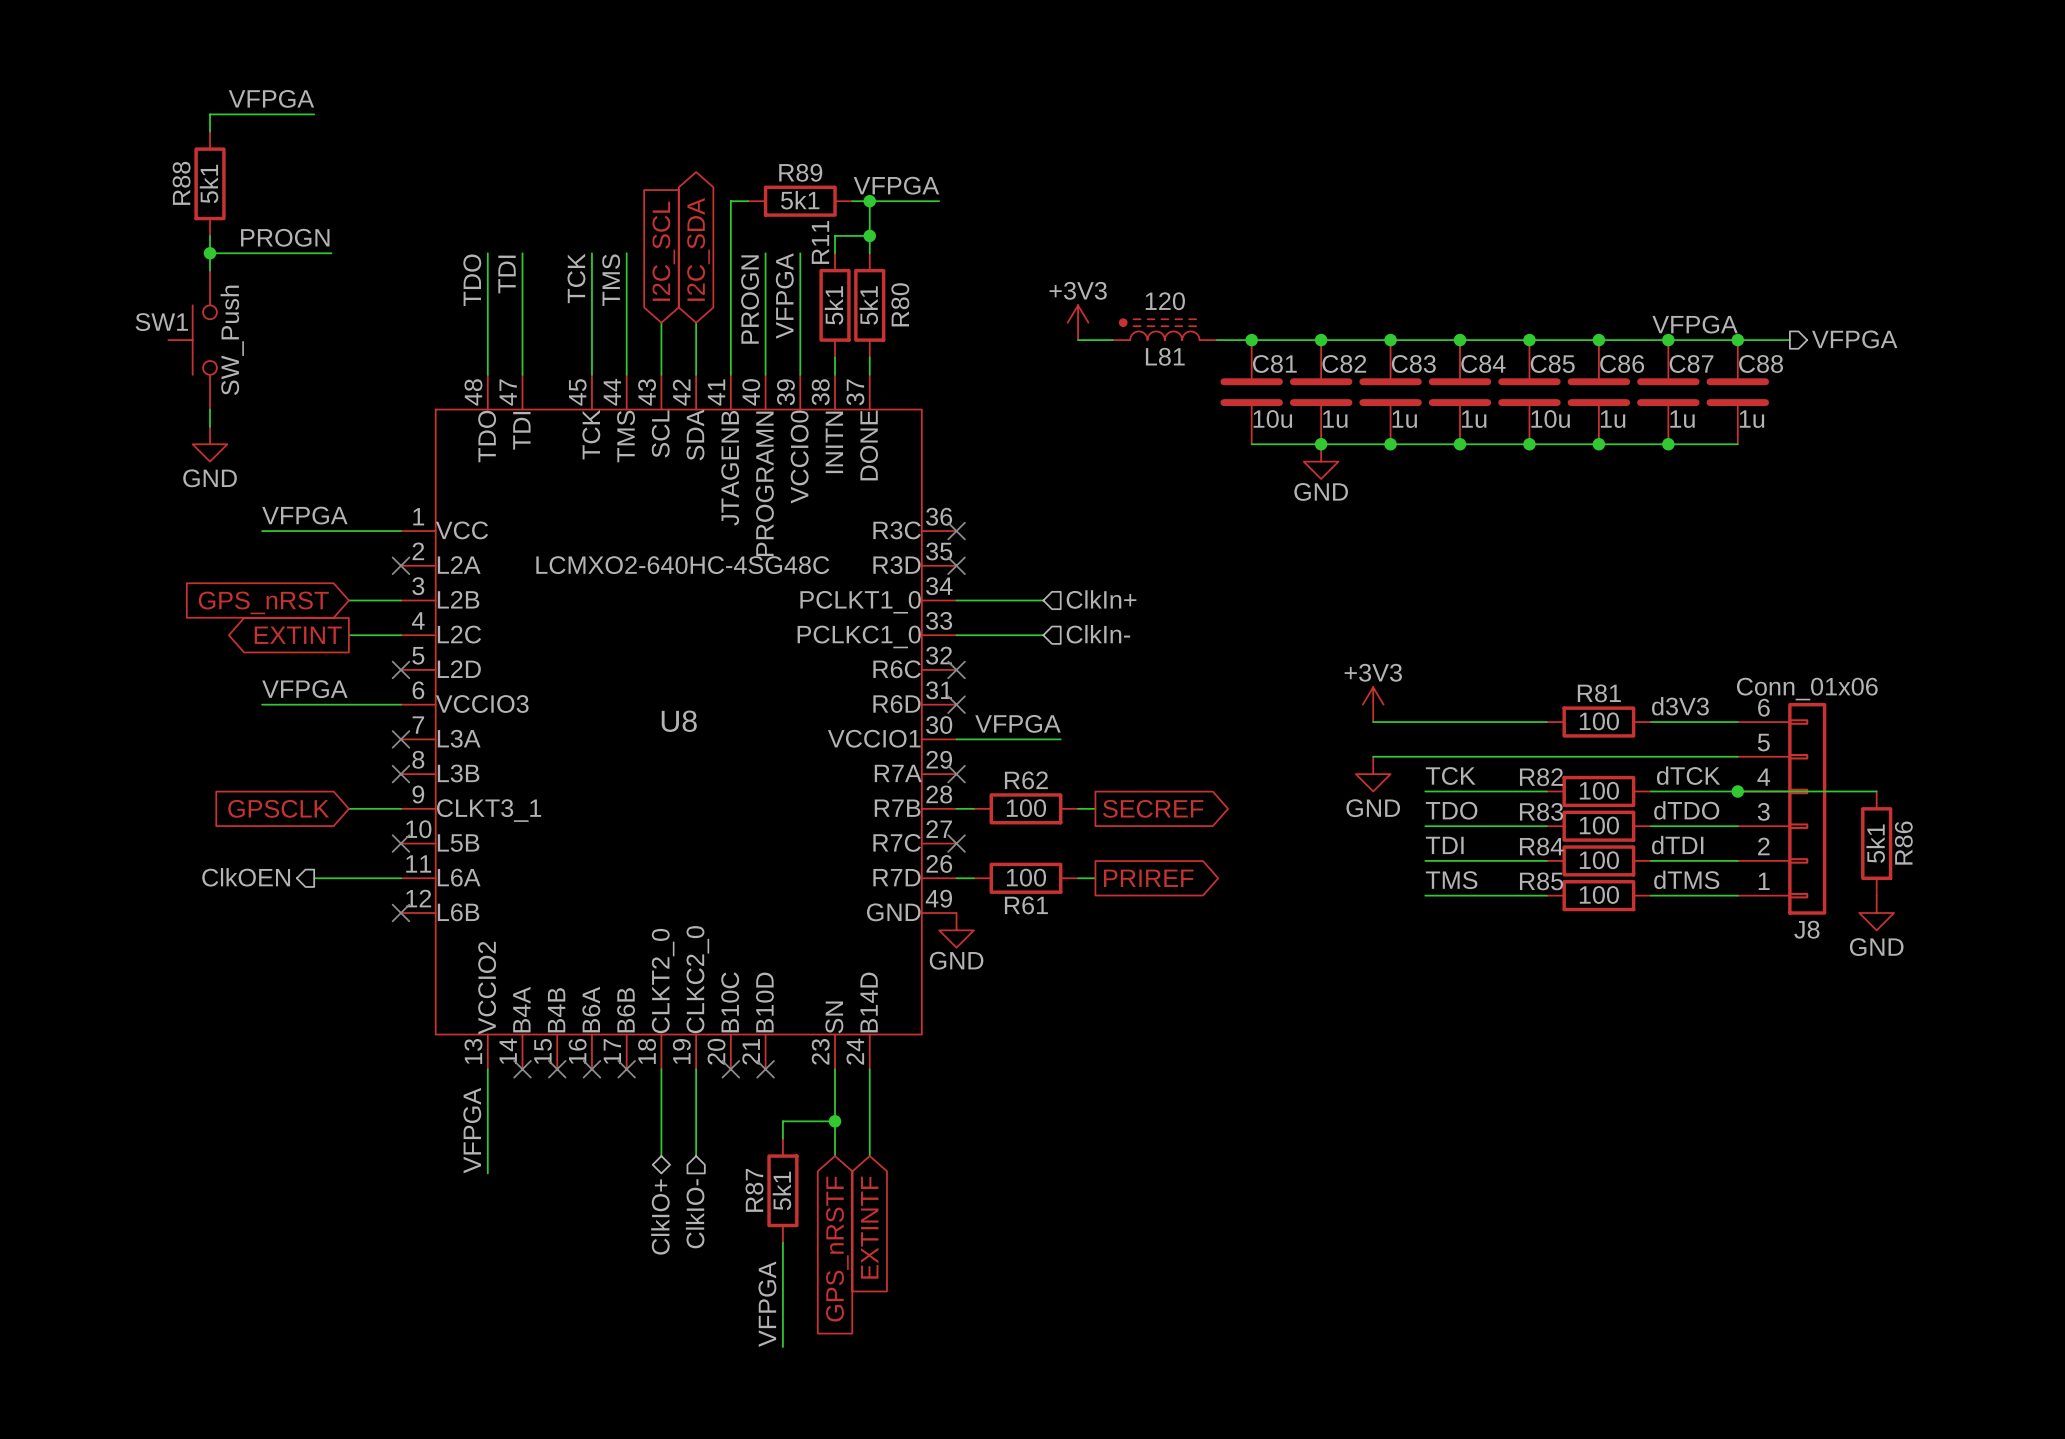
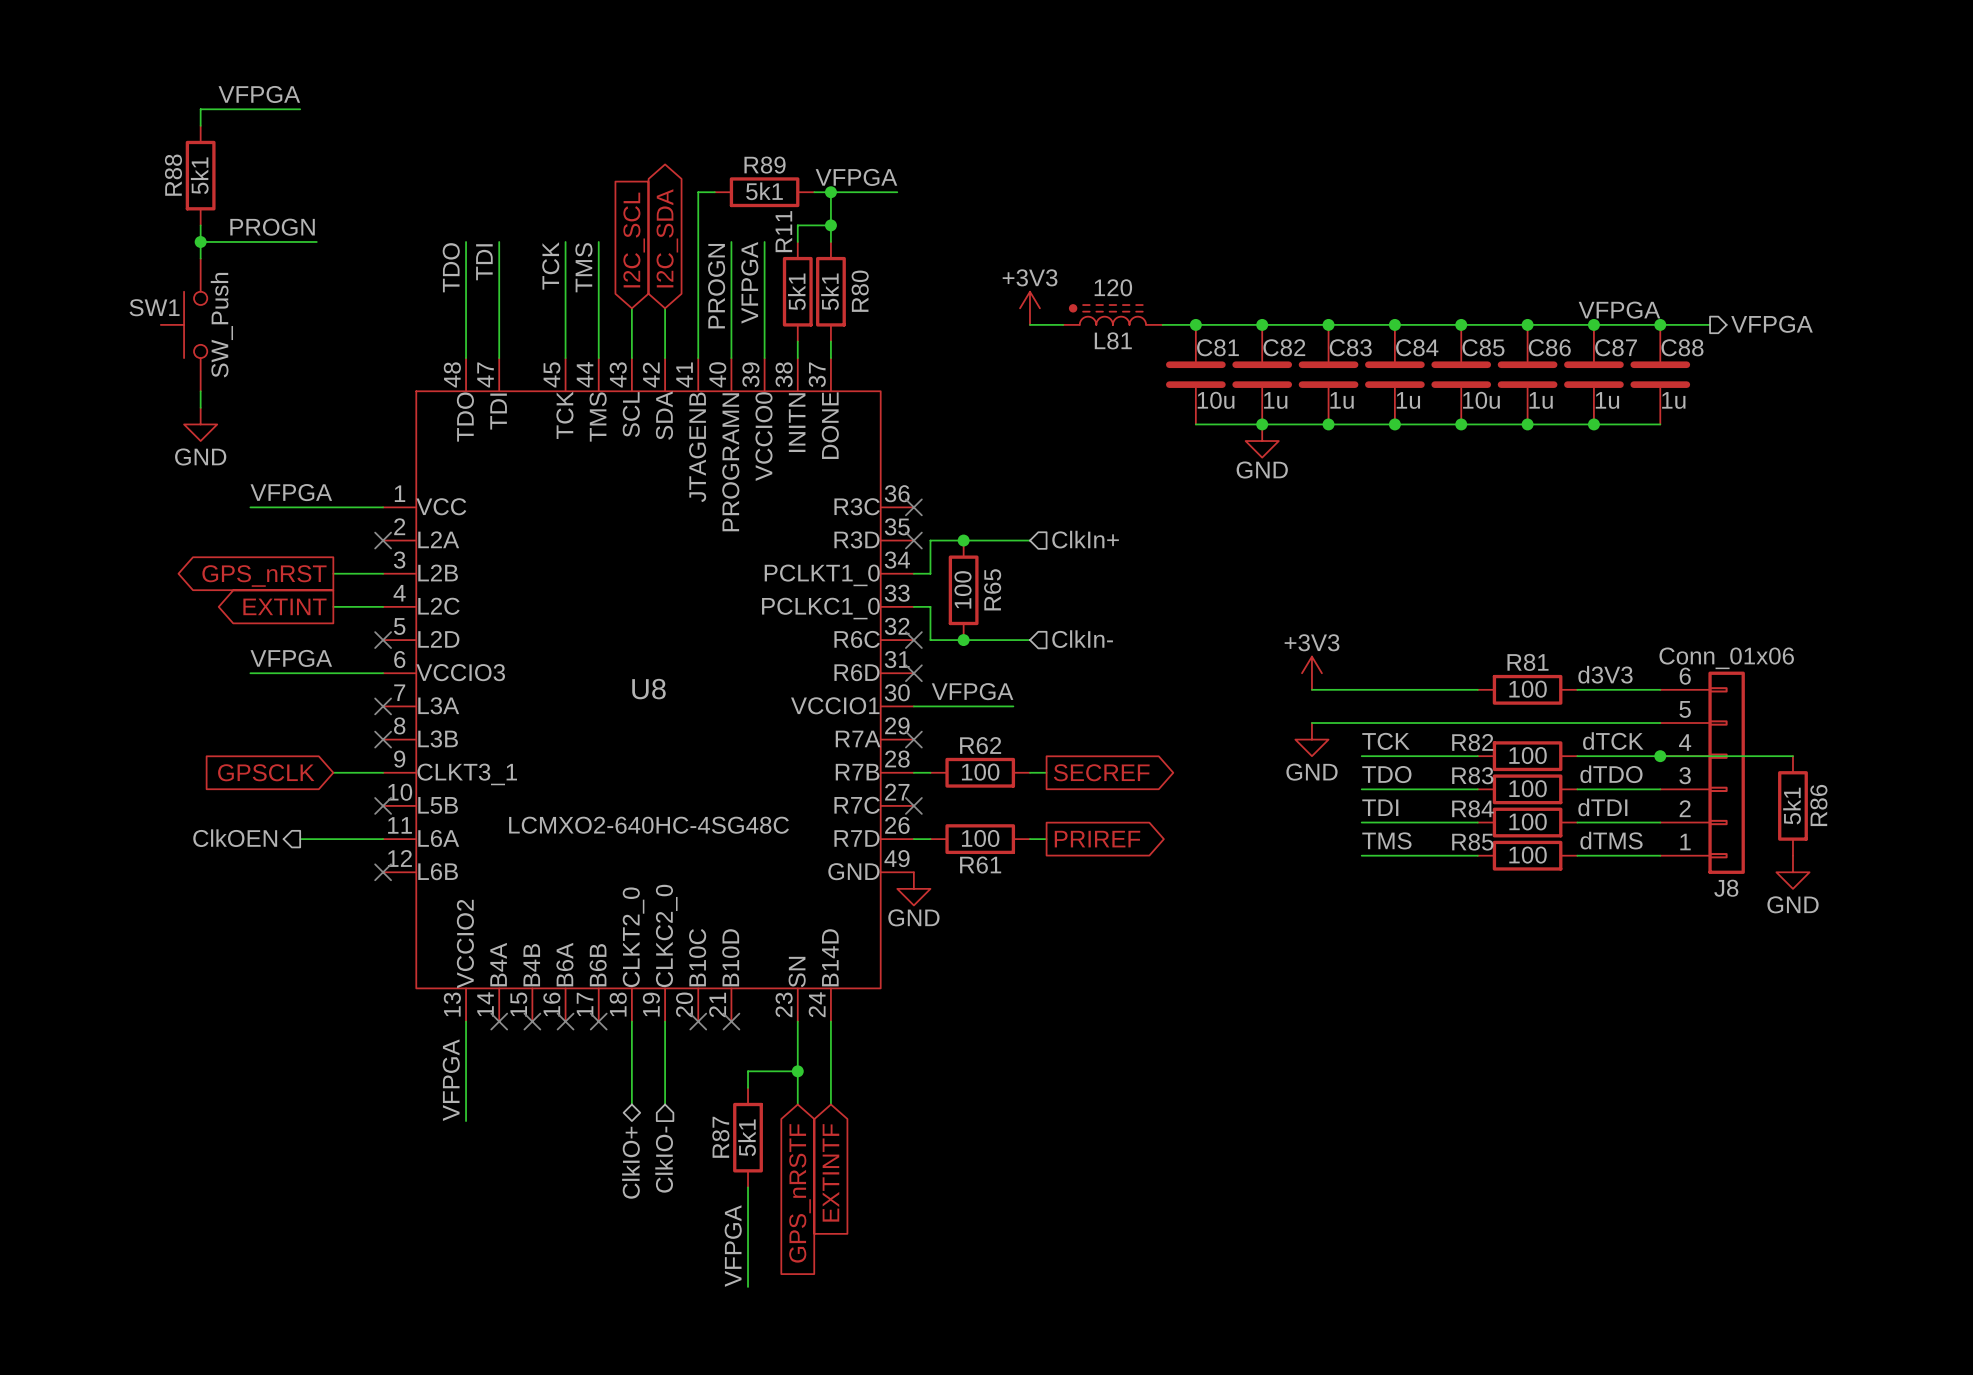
U8 value position: LCMXO2-640HC-4SG48C (682, 565) -> LCMXO2-640HC-4SG48C (649, 825)
junction: none -> (963, 540)
hierarchical label position: ClkIn+ (1101, 599) -> ClkIn+ (1085, 539)
wire: (973, 600) (1043, 600) -> (930, 573) (930, 540) (1029, 540)
global label shape: input (263, 602) -> output (264, 575)
R65: none -> 100 (963, 590)
hierarchical label position: ClkIn- (1098, 634) -> ClkIn- (1082, 639)
wire: (973, 635) (1043, 635) -> (930, 606) (930, 640) (1029, 640)
junction: none -> (963, 640)

